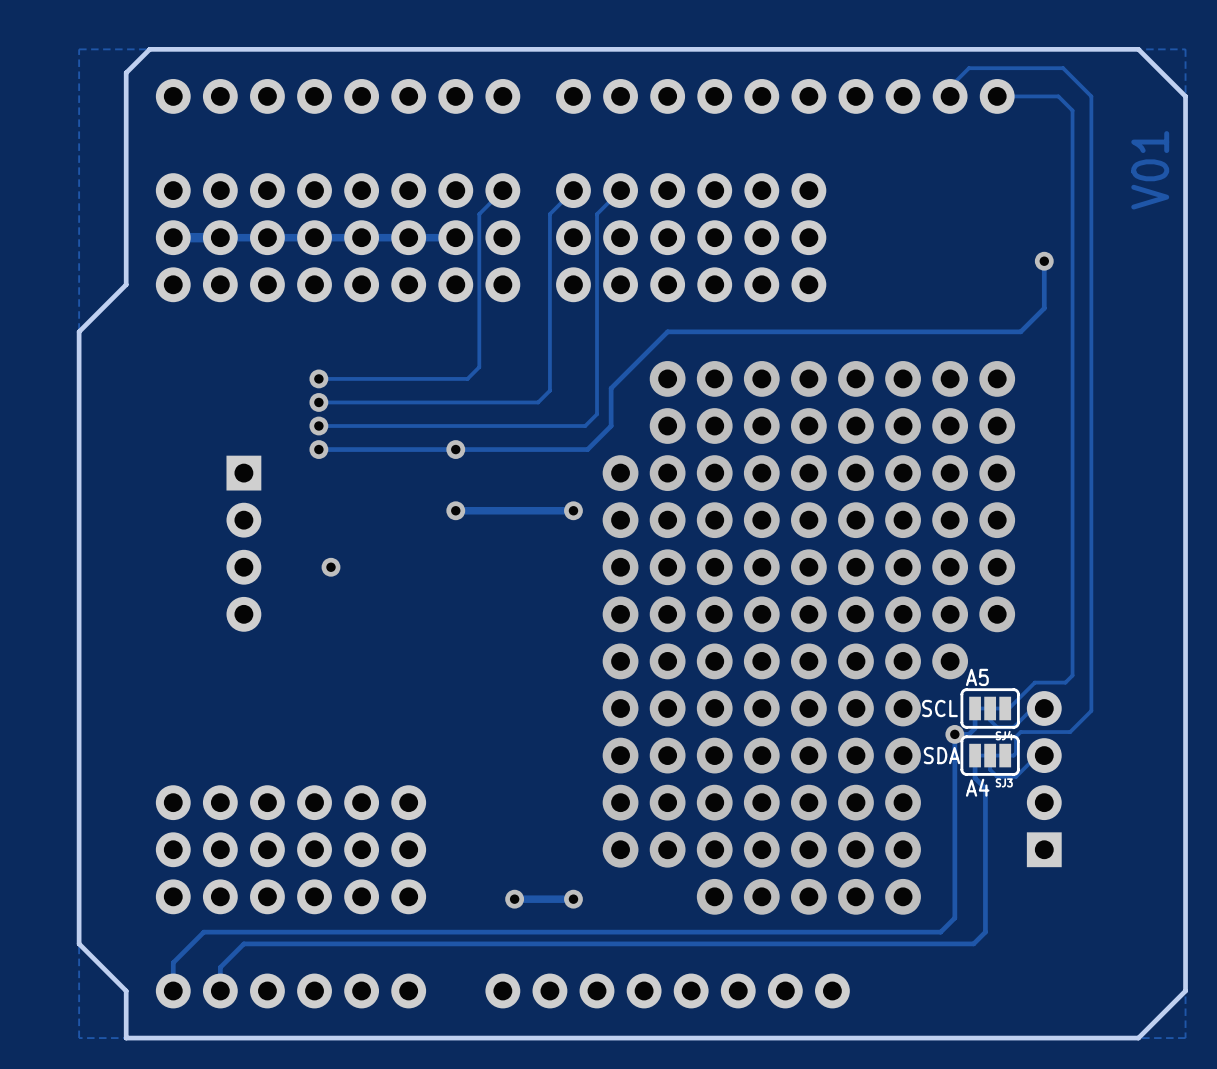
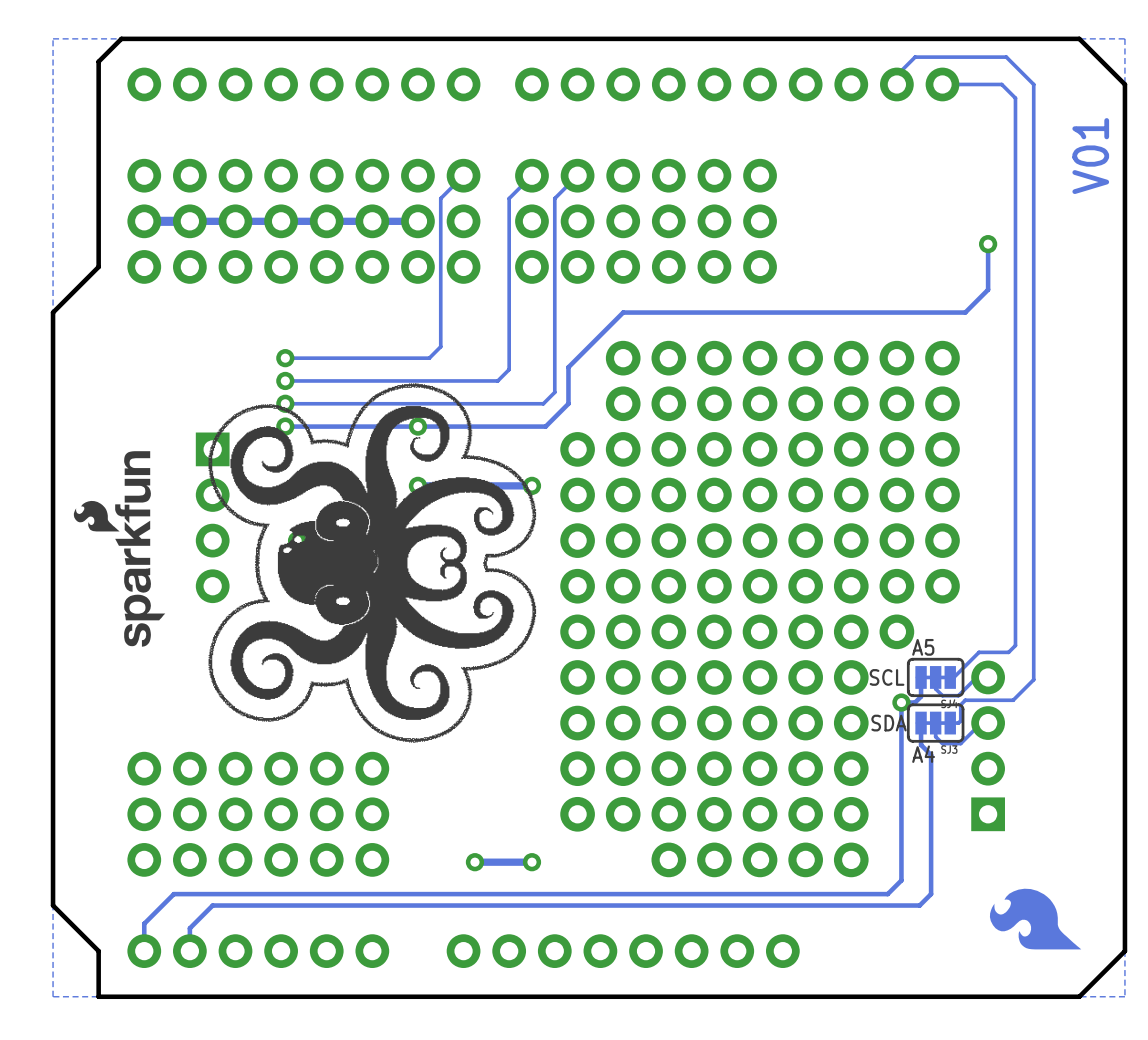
drawing: none -> [208, 383, 537, 743]
drawing: none -> [73, 451, 166, 647]
drawing: none -> [989, 888, 1082, 950]

